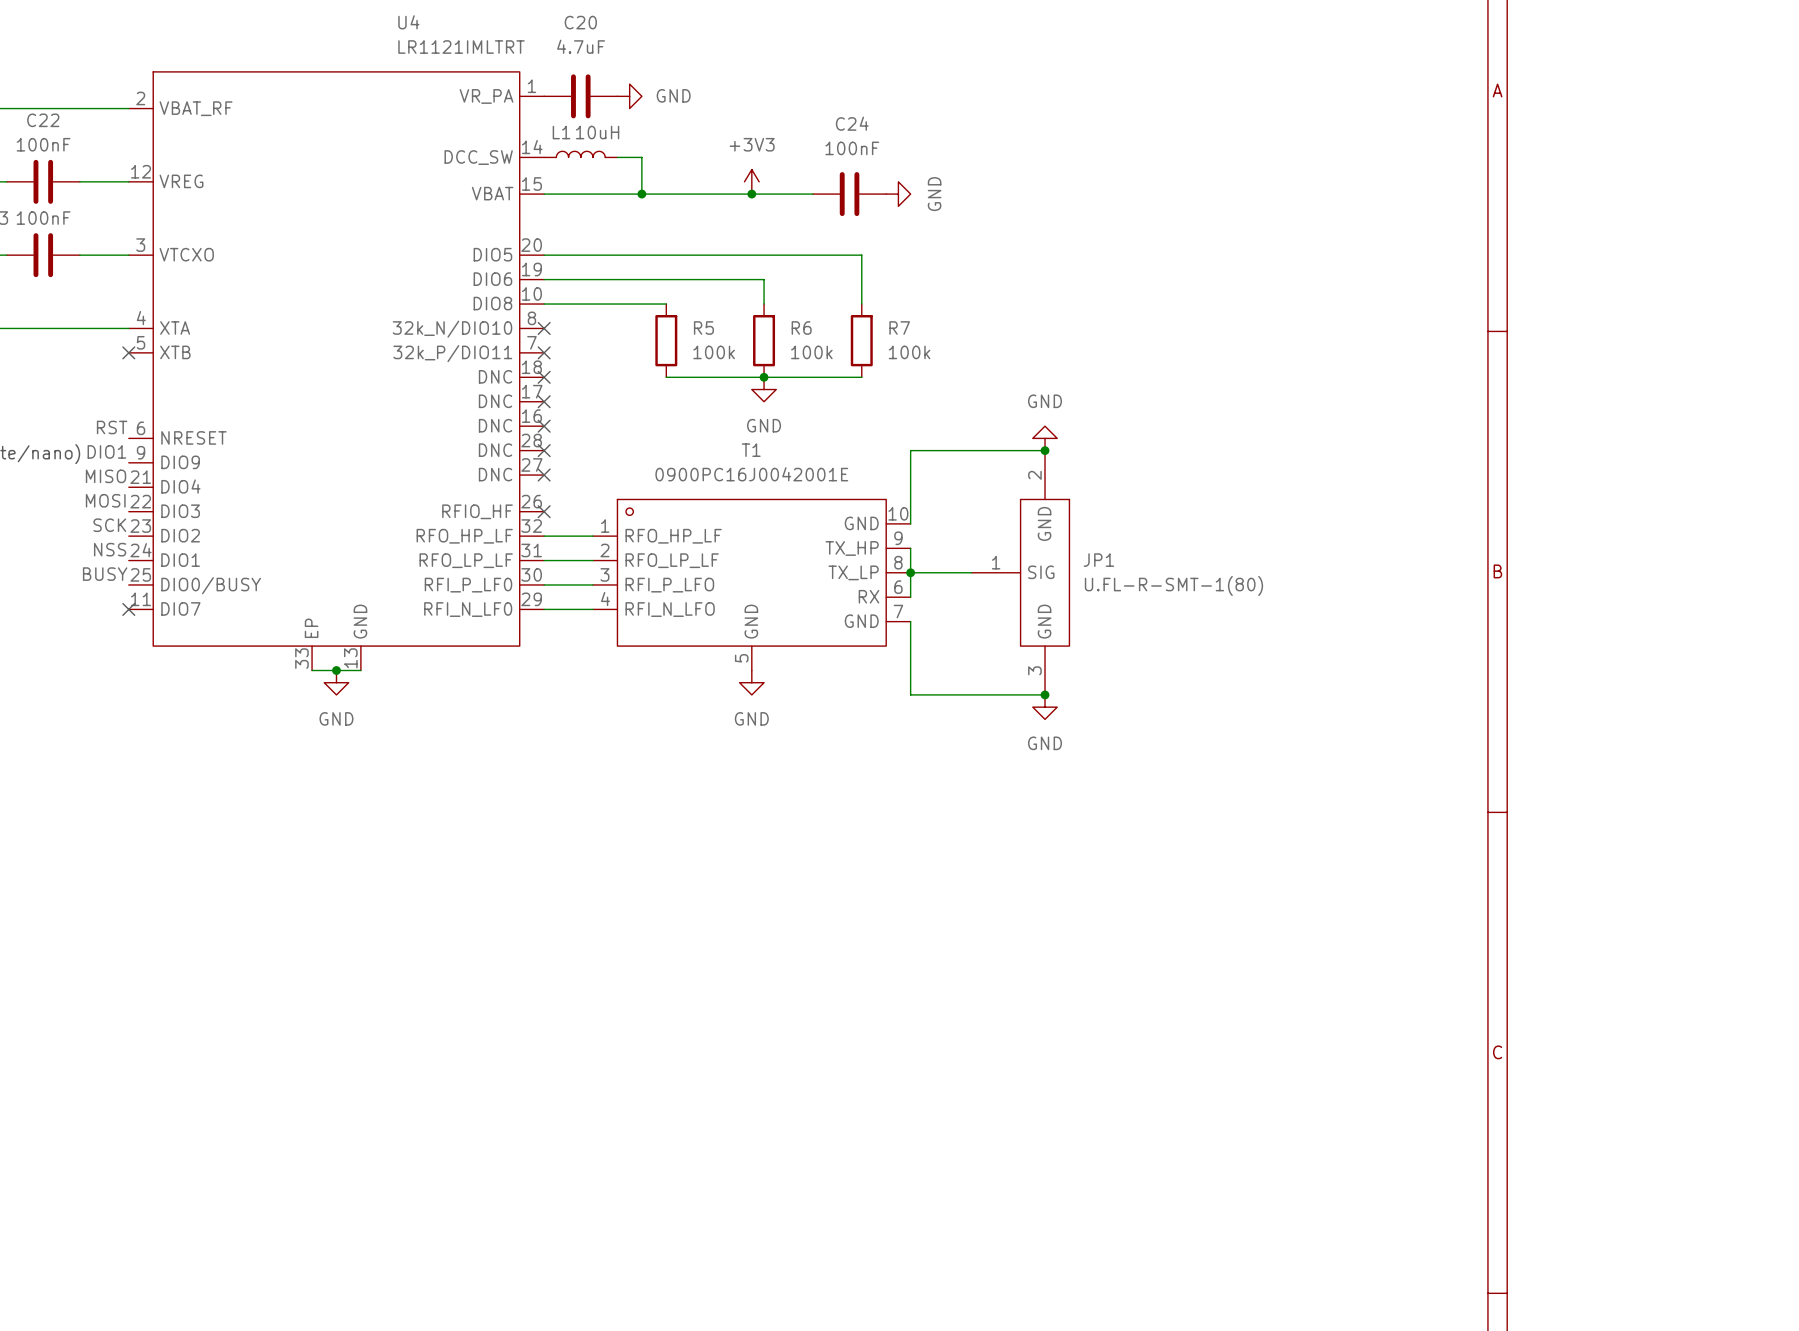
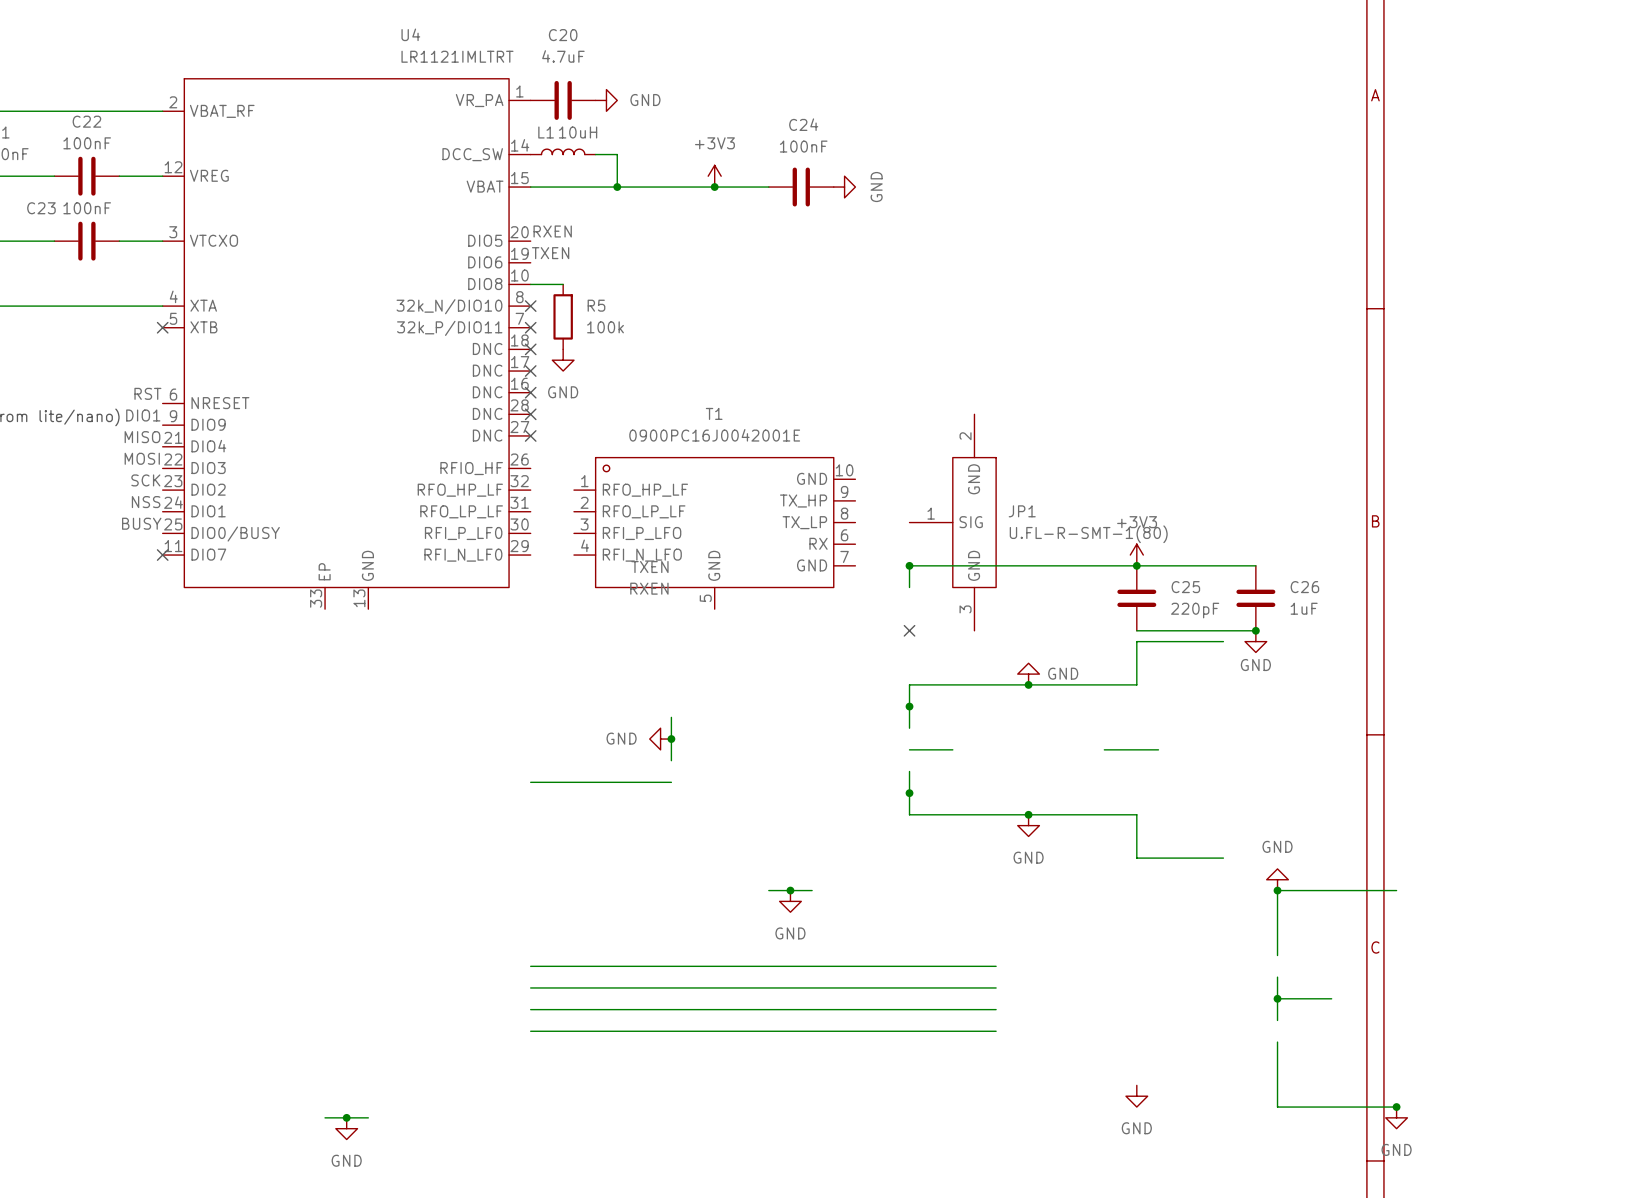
label: none -> RXEN (552, 231)
wire: (544, 255) (861, 255) (861, 304) -> none
label: none -> TXEN (550, 253)
wire: (544, 279) (764, 279) (764, 304) -> none
wire: (580, 304) (666, 304) -> none
R5 position: (666, 340) -> (563, 316)
R6: 100k (764, 340) -> none
R7: 100k (861, 340) -> none
wire: (666, 377) (861, 377) -> none
junction: (764, 377) -> none
power symbol: none -> GND (563, 360)
power symbol: GND (764, 389) -> none
power symbol: GND (1045, 438) -> none
wire: (1045, 450) (910, 450) (910, 523) -> none
junction: (1045, 450) -> none
no-connect mark: (544, 511) -> none
wire: (544, 536) (593, 536) -> none
wire: (910, 548) (910, 597) -> none
wire: (544, 560) (593, 560) -> none
wire: (910, 572) (971, 572) -> none
junction: (910, 572) -> none
wire: (544, 584) (593, 584) -> none
wire: (544, 609) (593, 609) -> none
power symbol: none -> +3V3 (1136, 555)
wire: (910, 621) (910, 694) (1045, 694) -> none
junction: none -> (909, 565)
junction: none -> (1136, 565)
wire: none -> (1255, 565) (909, 565) (909, 587)
label: none -> TXEN (649, 567)
label: none -> RXEN (649, 588)
C25: none -> 220pF (1136, 598)
C26: none -> 1uF (1255, 598)
wire: (312, 670) (360, 670) -> none
junction: (336, 670) -> none
power symbol: GND (336, 682) -> none
power symbol rotation: 0° (751, 682) -> 90° clockwise (660, 739)
power symbol position: GND (751, 682) -> GND (660, 739)
no-connect mark: none -> (909, 630)
junction: (1045, 694) -> none
wire: none -> (1136, 630) (1255, 630)
junction: none -> (1255, 630)
power symbol rotation: 0° (1045, 707) -> 180° (1028, 674)
power symbol position: GND (1045, 707) -> GND (1028, 674)
wire: none -> (1223, 641) (1136, 641) (1136, 684) (909, 684) (909, 728)
power symbol: none -> GND (1255, 641)
power symbol text position: GND (1045, 743) -> GND (1063, 673)
junction: none -> (1028, 684)
junction: none -> (909, 706)
wire: none -> (671, 717) (671, 760)
junction: none -> (671, 739)
wire: none -> (909, 749) (952, 749)
wire: none -> (1104, 749) (1158, 749)
wire: none -> (909, 771) (909, 814) (1136, 814) (1136, 858) (1223, 858)
wire: none -> (530, 782) (671, 782)
junction: none -> (909, 793)
junction: none -> (1028, 814)
power symbol: none -> GND (1028, 825)
power symbol: none -> GND (1277, 879)
wire: none -> (768, 890) (812, 890)
junction: none -> (790, 890)
junction: none -> (1277, 890)
wire: none -> (1396, 890) (1277, 890) (1277, 955)
power symbol: none -> GND (790, 901)
wire: none -> (530, 966) (996, 966)
wire: none -> (1277, 977) (1277, 1020)
wire: none -> (530, 987) (996, 987)
wire: none -> (1277, 998) (1331, 998)
junction: none -> (1277, 998)
wire: none -> (530, 1009) (996, 1009)
wire: none -> (530, 1031) (996, 1031)
wire: none -> (1277, 1042) (1277, 1107) (1396, 1107)
power symbol: none -> GND (1136, 1096)
junction: none -> (1396, 1107)
wire: none -> (325, 1117) (368, 1117)
junction: none -> (346, 1117)
power symbol: none -> GND (1396, 1117)
power symbol: none -> GND (346, 1128)

